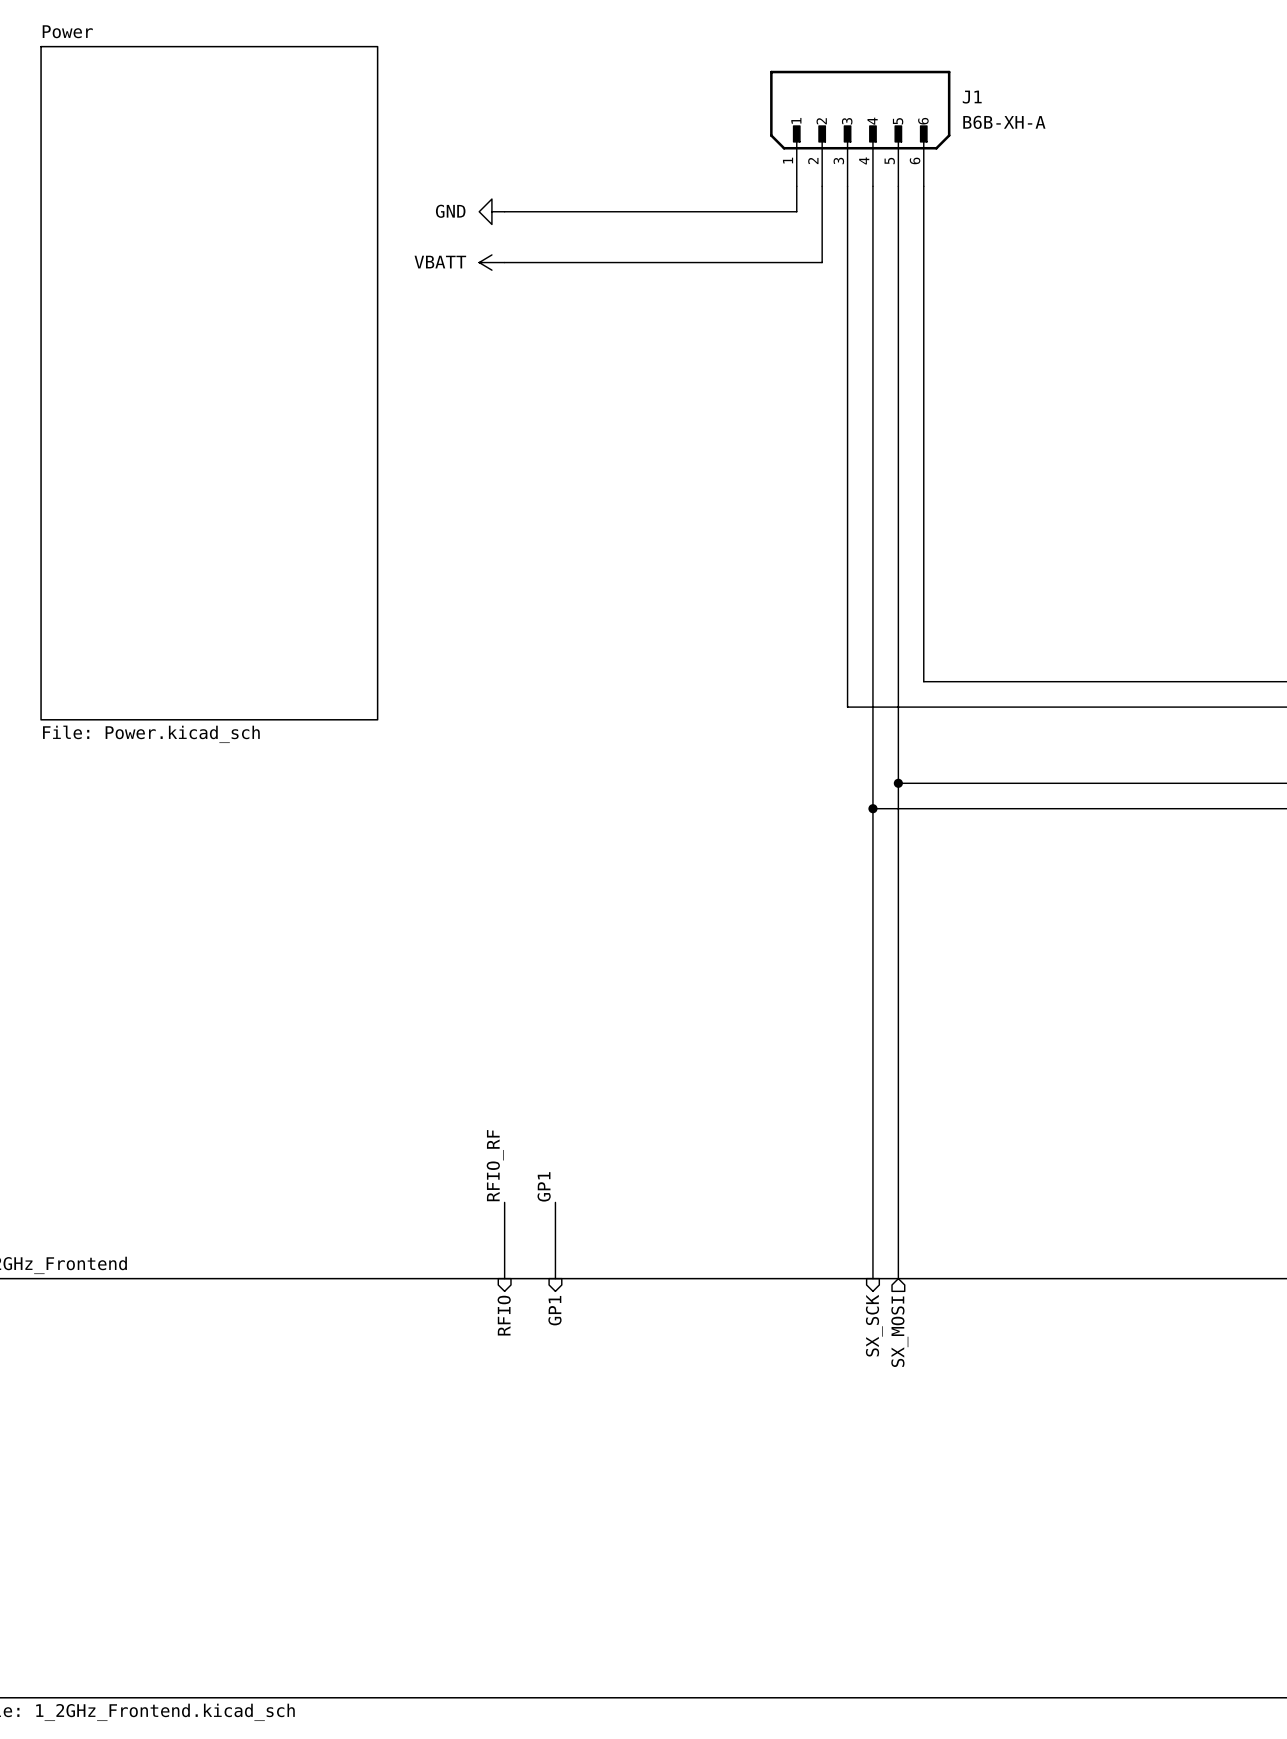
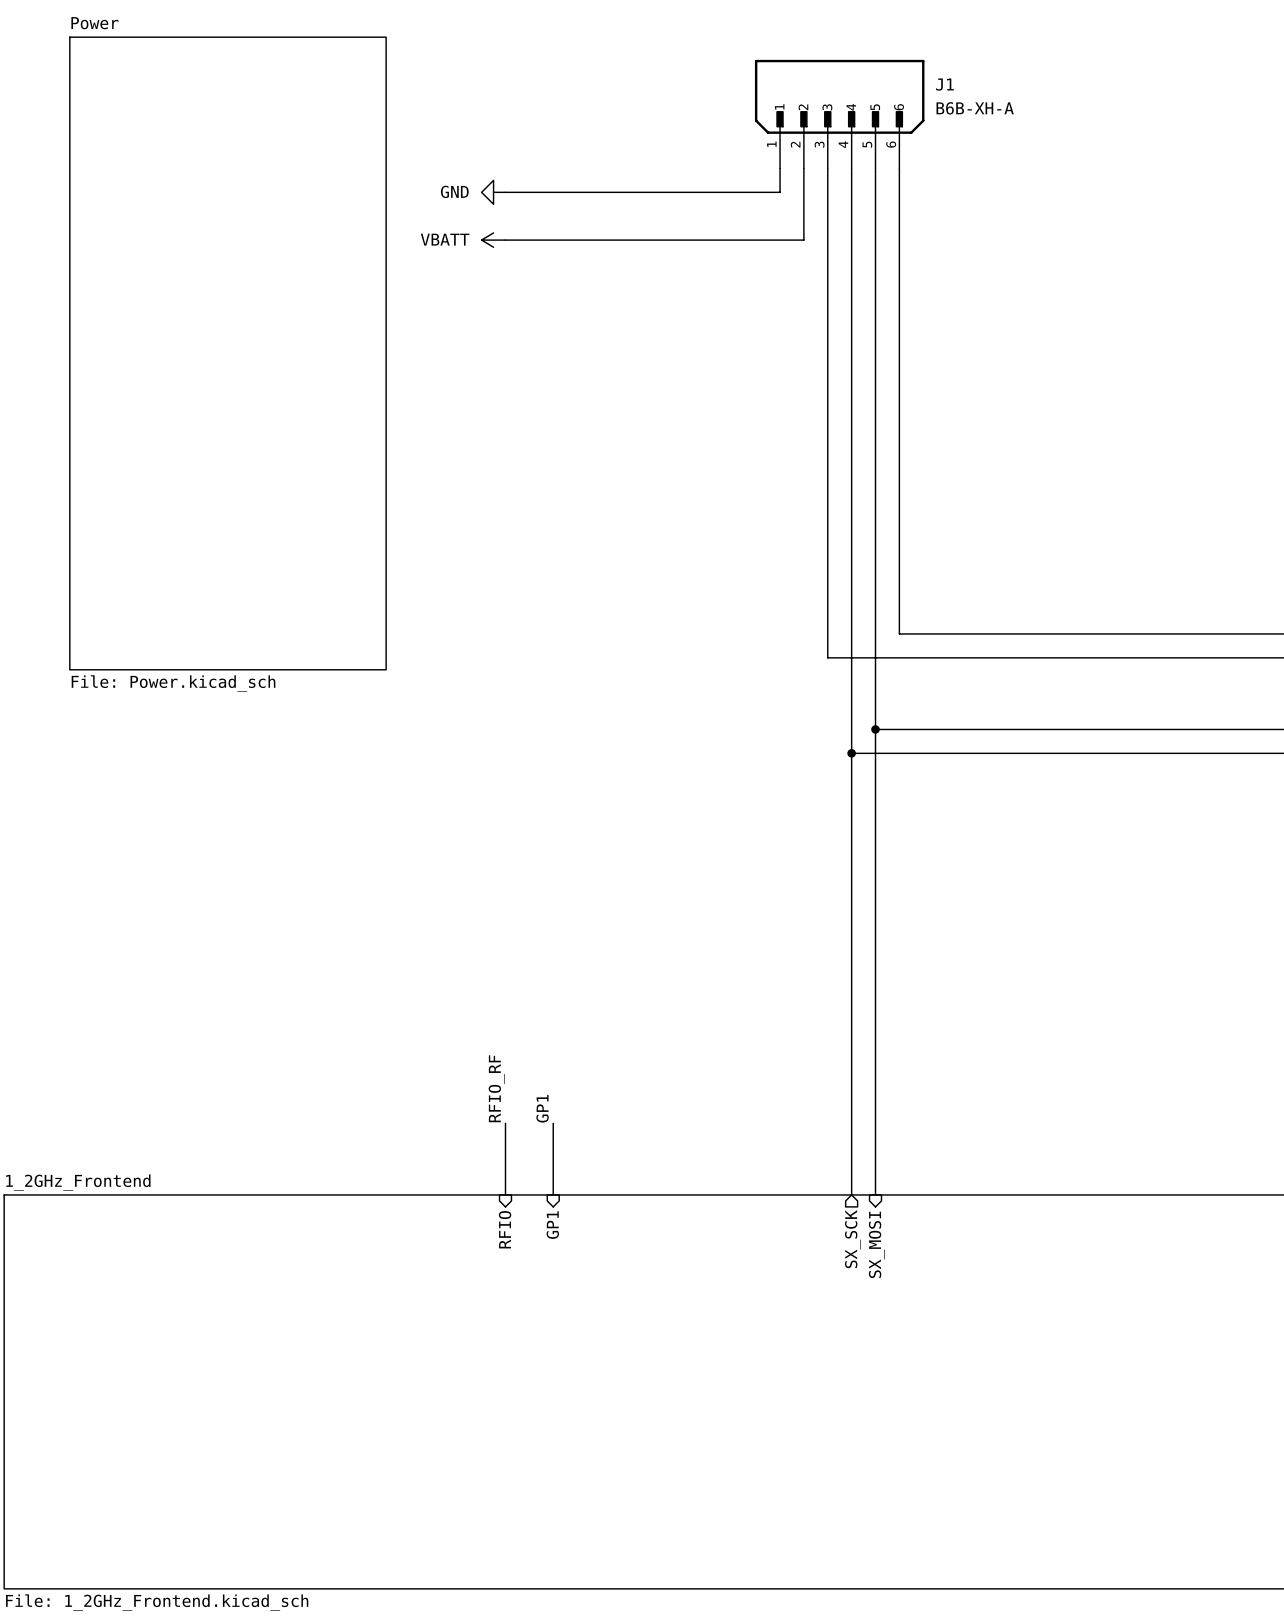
sheet pin: SX_SCK (874, 1325) -> none
hierarchical label: none -> SX_SCK (853, 1239)
sheet pin: SX_MOSI (899, 1331) -> none
hierarchical label: none -> SX_MOSI (876, 1244)

